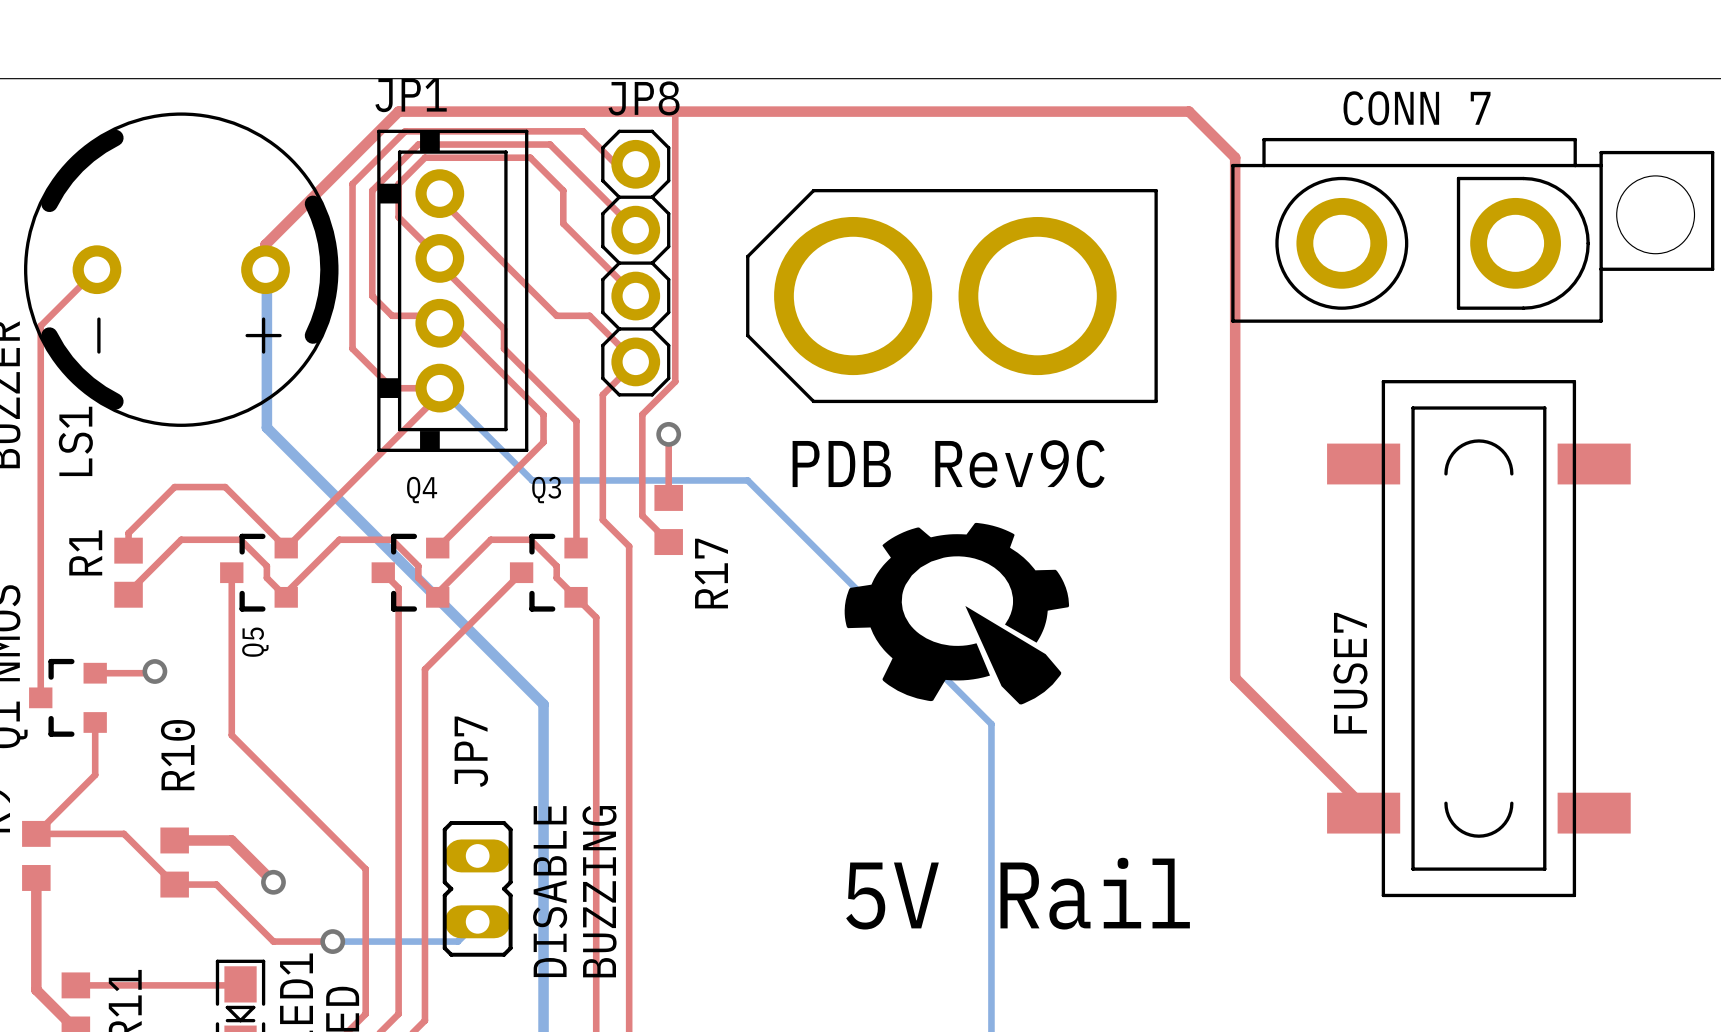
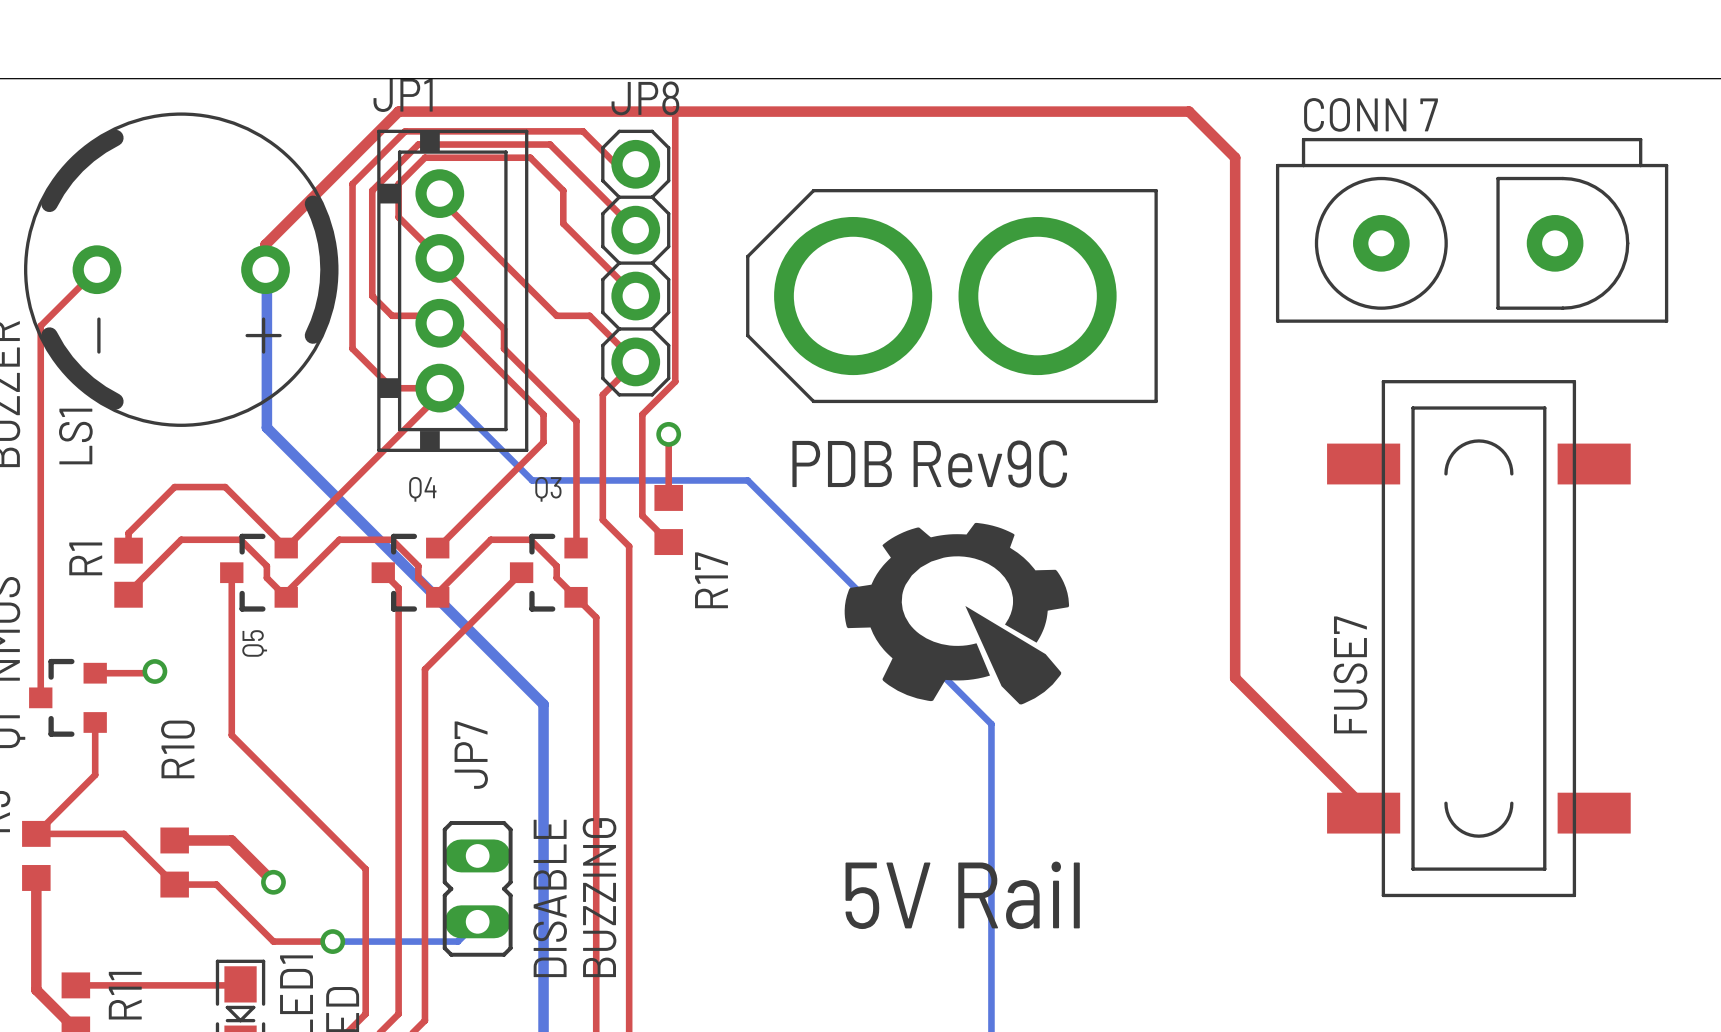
text position: CONN 7 (1417, 108) -> CONN 7 (1371, 114)
part footprint: [1231, 137, 1715, 323] -> [1275, 137, 1669, 323]

